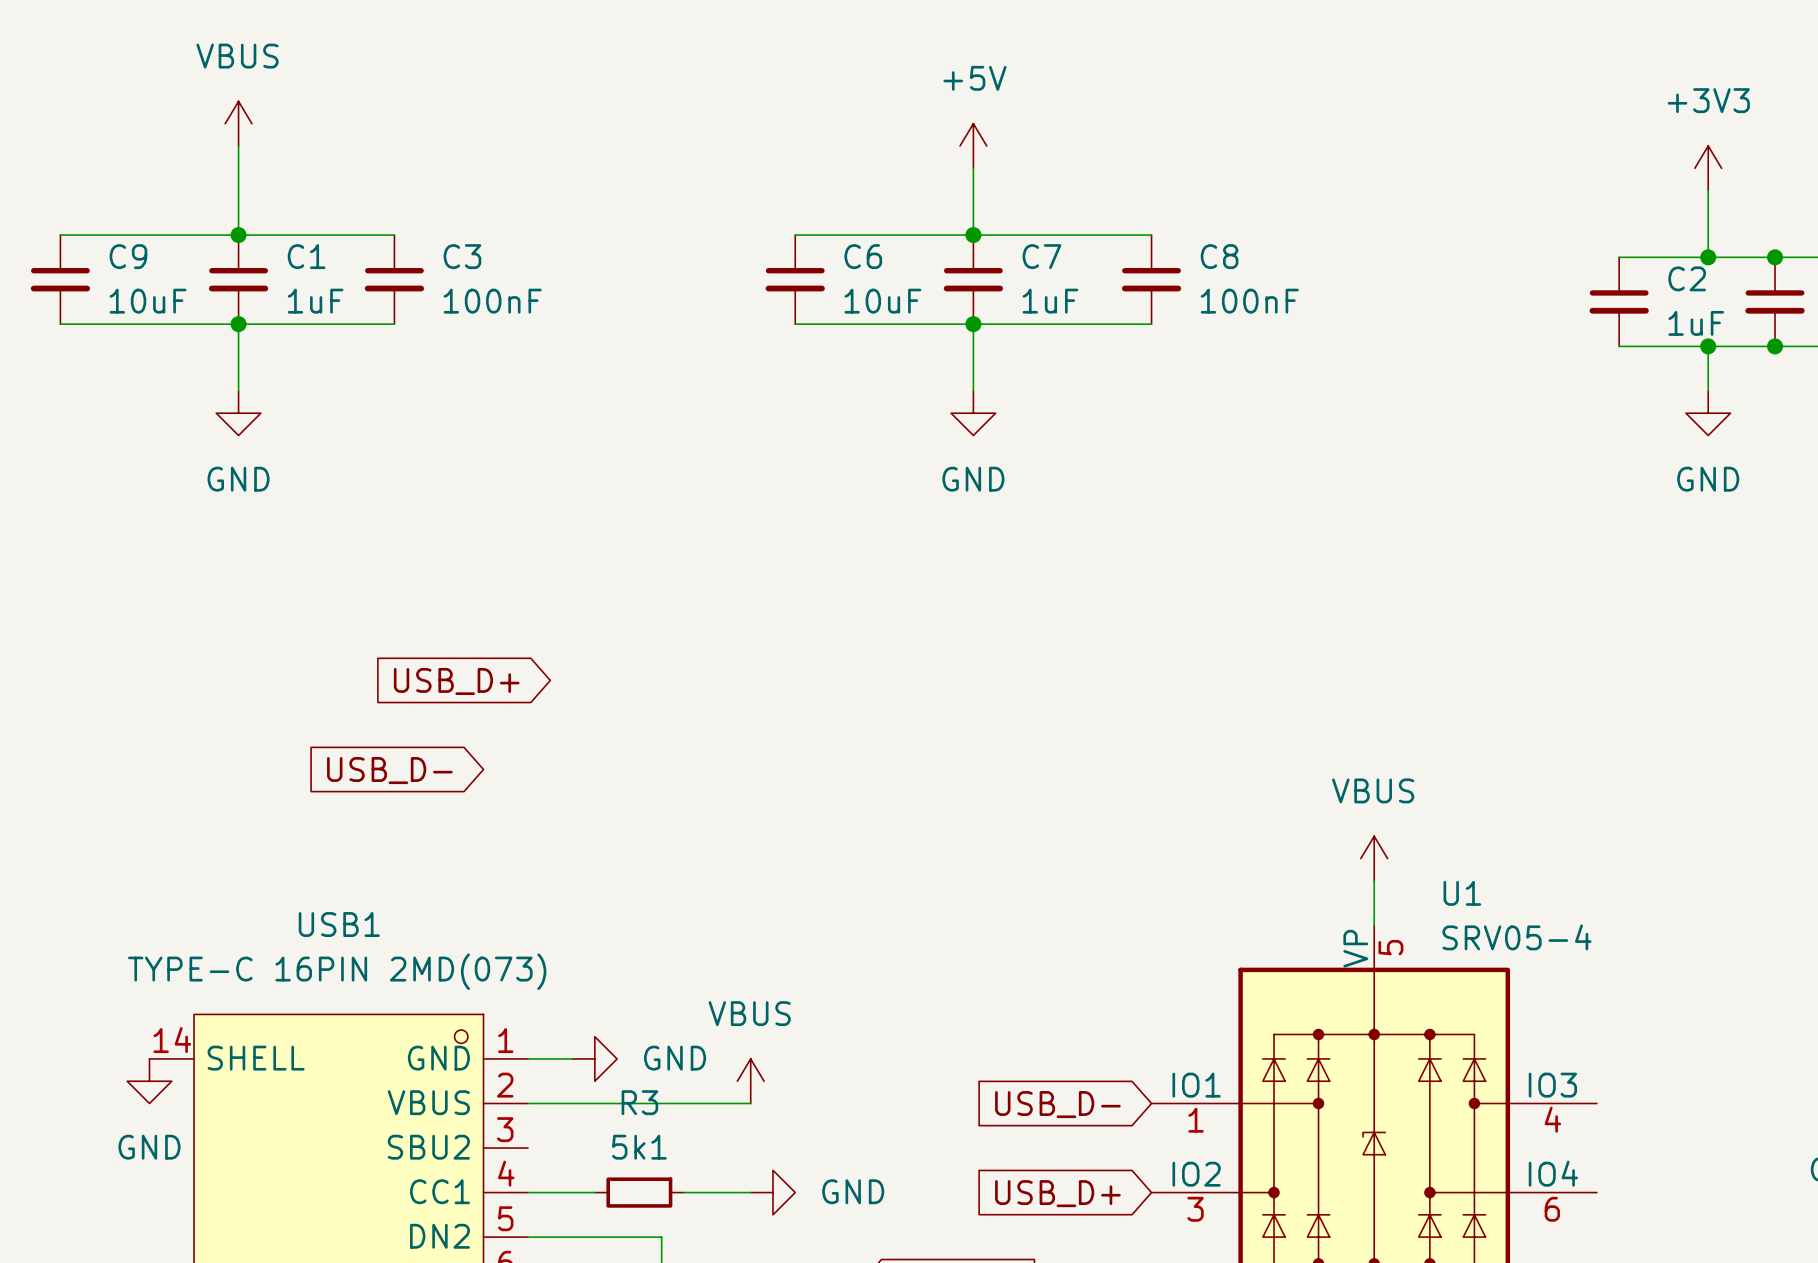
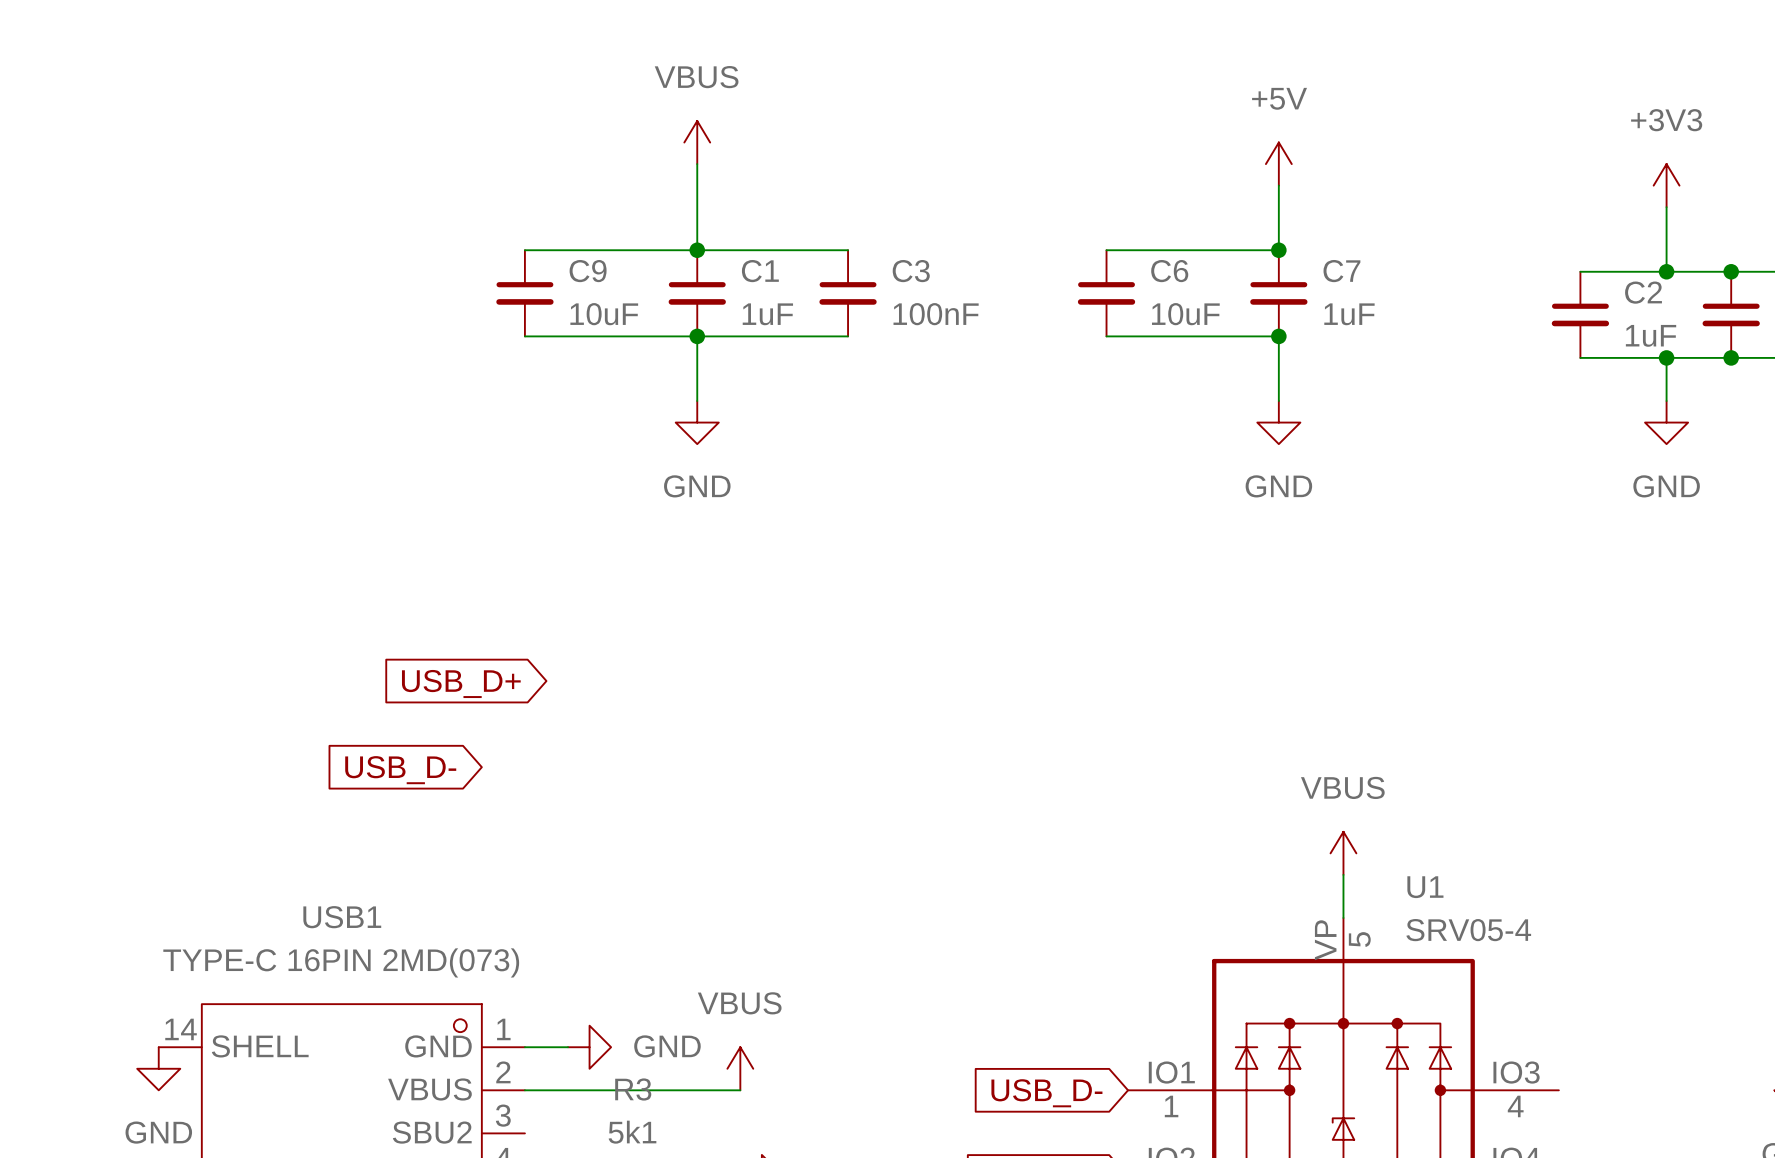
power symbol: VBUS (238, 123) -> none
power symbol: none -> VBUS (697, 142)
wire: (238, 145) (238, 235) -> none
wire: none -> (697, 164) (697, 250)
power symbol position: +5V (973, 145) -> +5V (1278, 164)
wire: (973, 168) (973, 235) -> none
wire: none -> (1278, 185) (1278, 250) (1128, 250)
wire: (60, 235) (394, 235) -> none
junction: (238, 235) -> none
junction: none -> (697, 250)
wire: (862, 235) (1129, 235) -> (524, 250) (783, 250)
junction: (973, 235) -> none
junction: none -> (1278, 250)
C9 position: (60, 279) -> (524, 293)
C1 position: (238, 279) -> (697, 293)
C3 position: (394, 279) -> (848, 293)
C6 position: (795, 279) -> (1106, 293)
C7 position: (973, 279) -> (1278, 293)
C8: 100nF (1151, 279) -> none
wire: (60, 324) (394, 324) -> none
wire: (238, 324) (238, 390) -> none
junction: (238, 324) -> none
junction: none -> (697, 336)
wire: (862, 324) (1129, 324) -> (524, 336) (783, 336)
wire: (973, 324) (973, 390) -> (697, 336) (697, 401)
junction: (973, 324) -> none
wire: none -> (1128, 336) (1278, 336) (1278, 401)
junction: none -> (1278, 336)
power symbol: GND (238, 413) -> none
power symbol: none -> GND (697, 422)
power symbol: GND (973, 413) -> none
power symbol: none -> GND (1278, 422)

